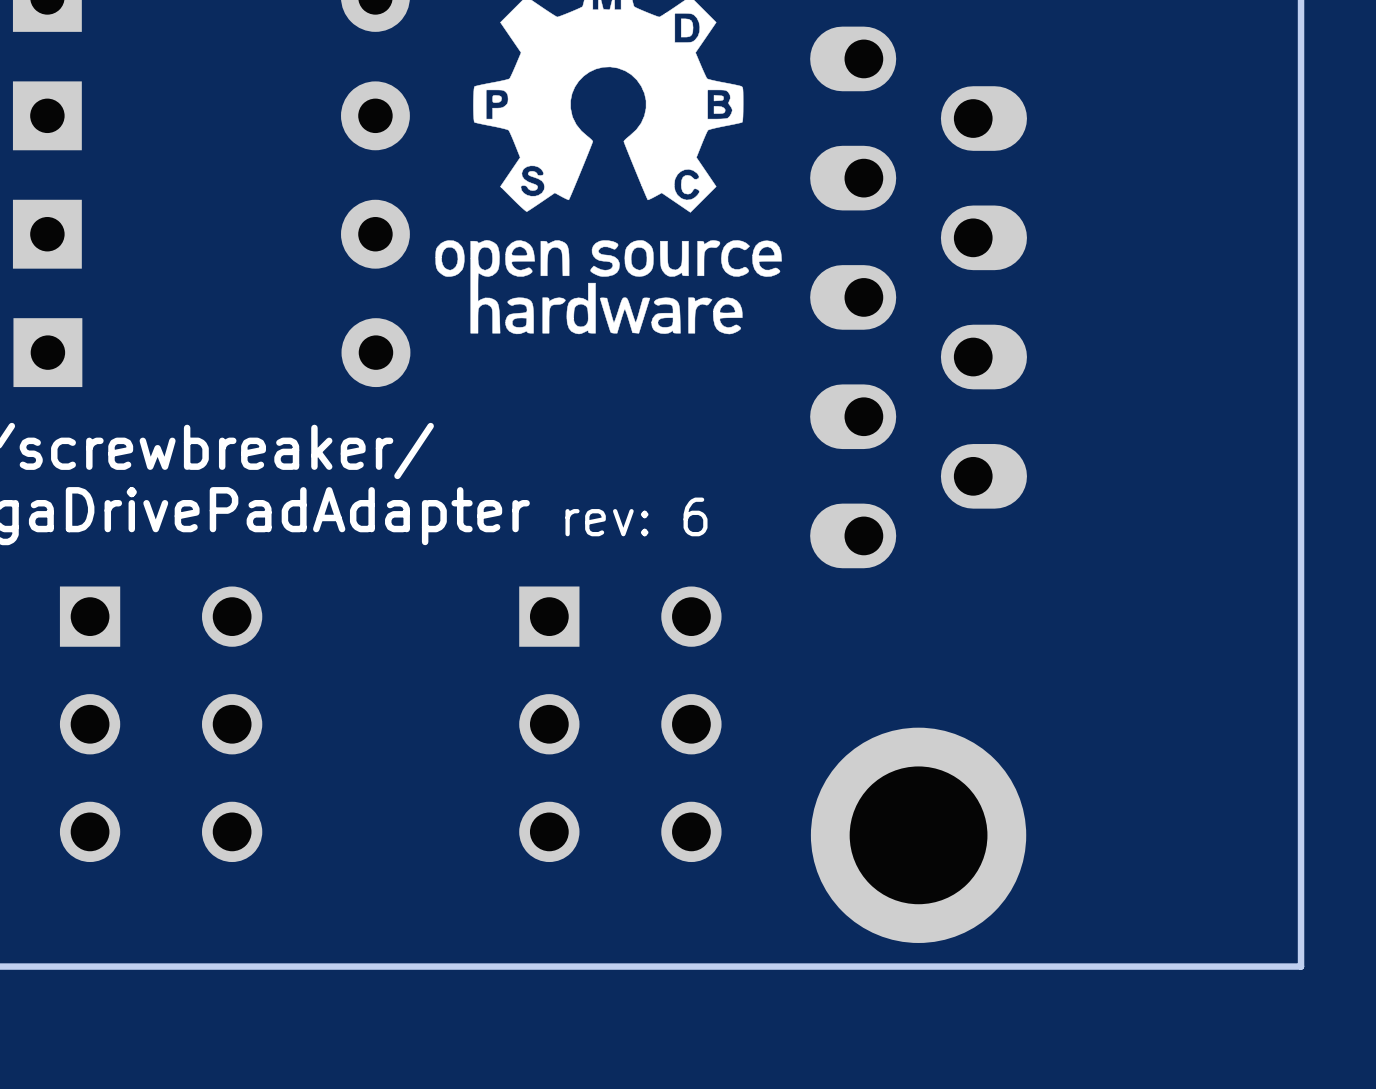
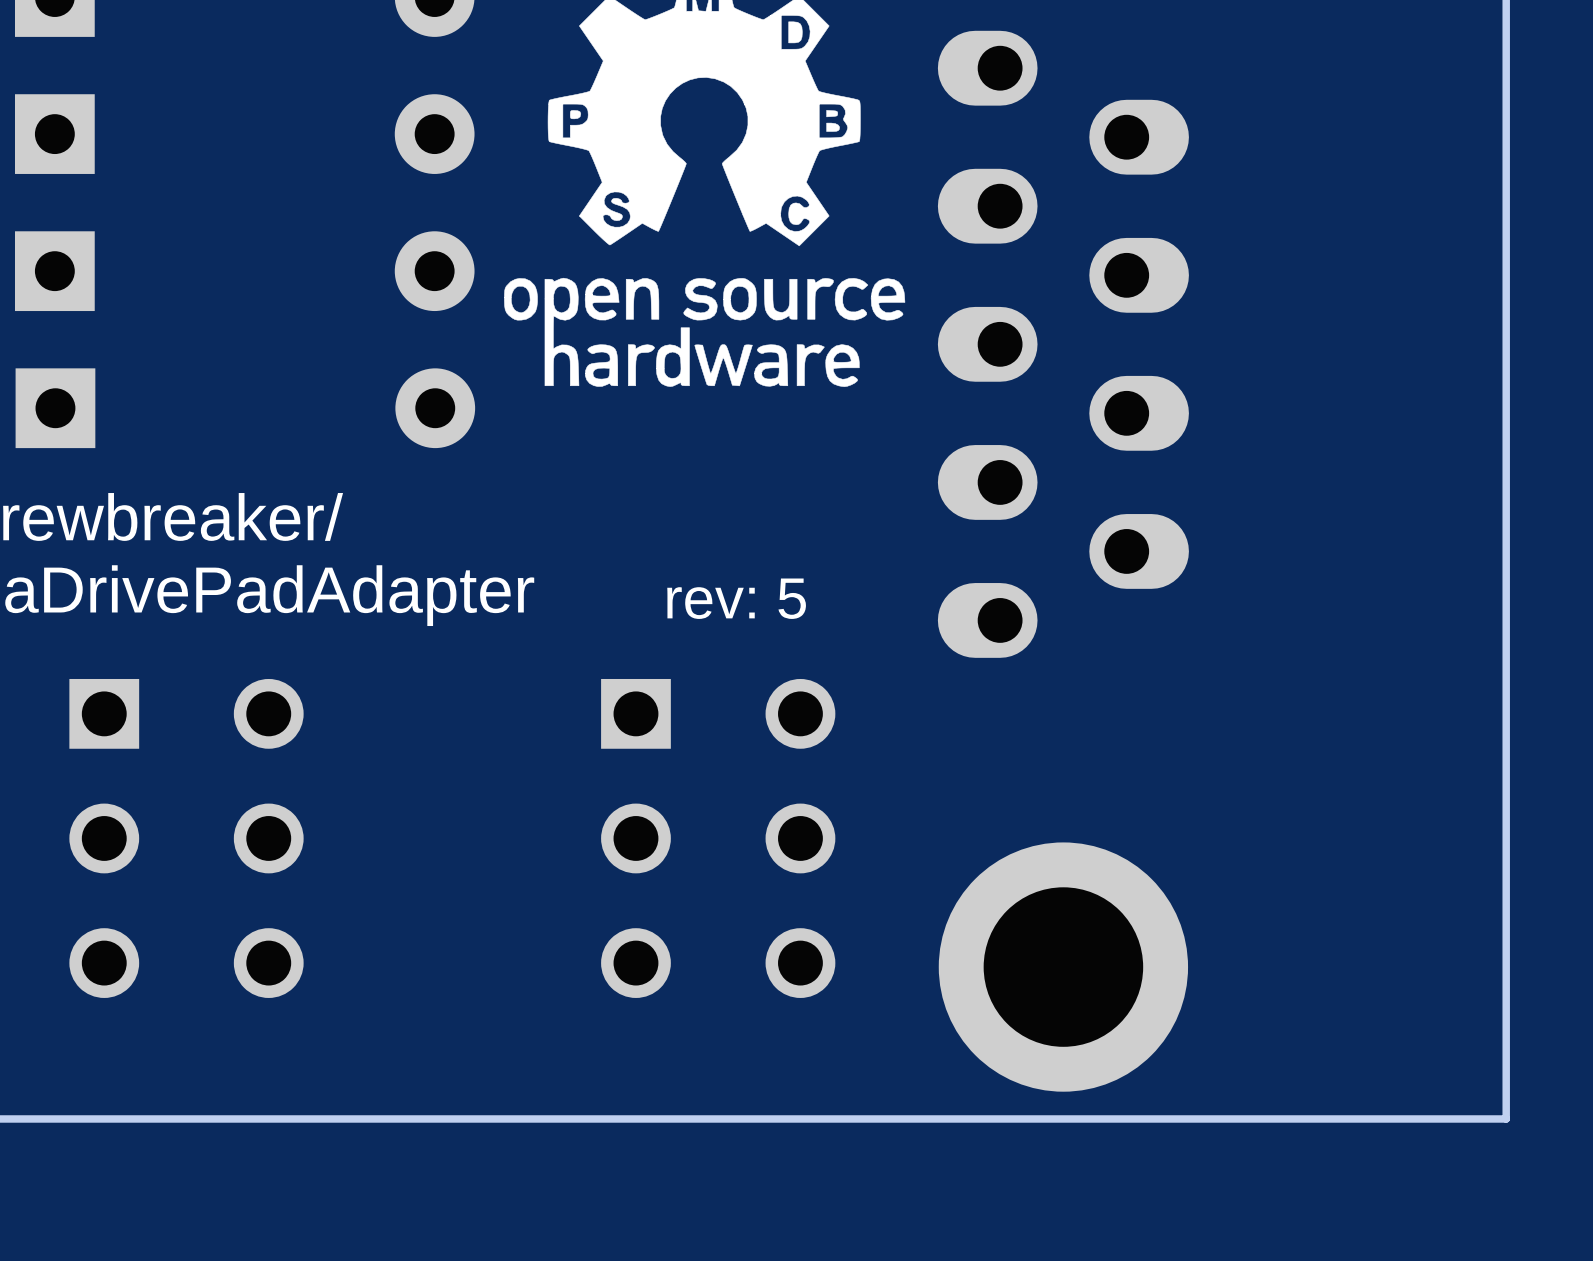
text: rev: 6 (636, 516) -> rev: 5 (736, 598)

